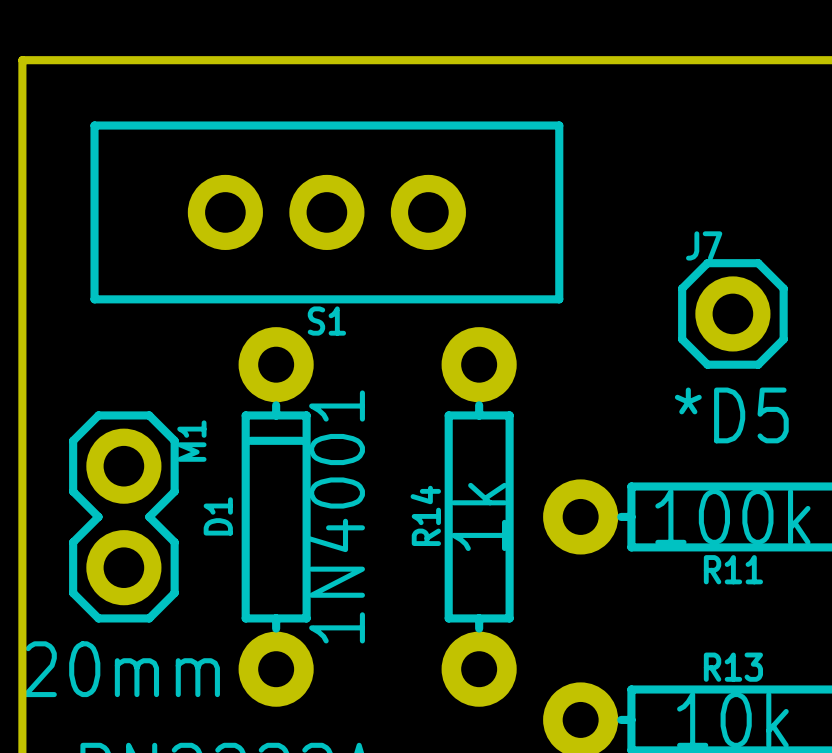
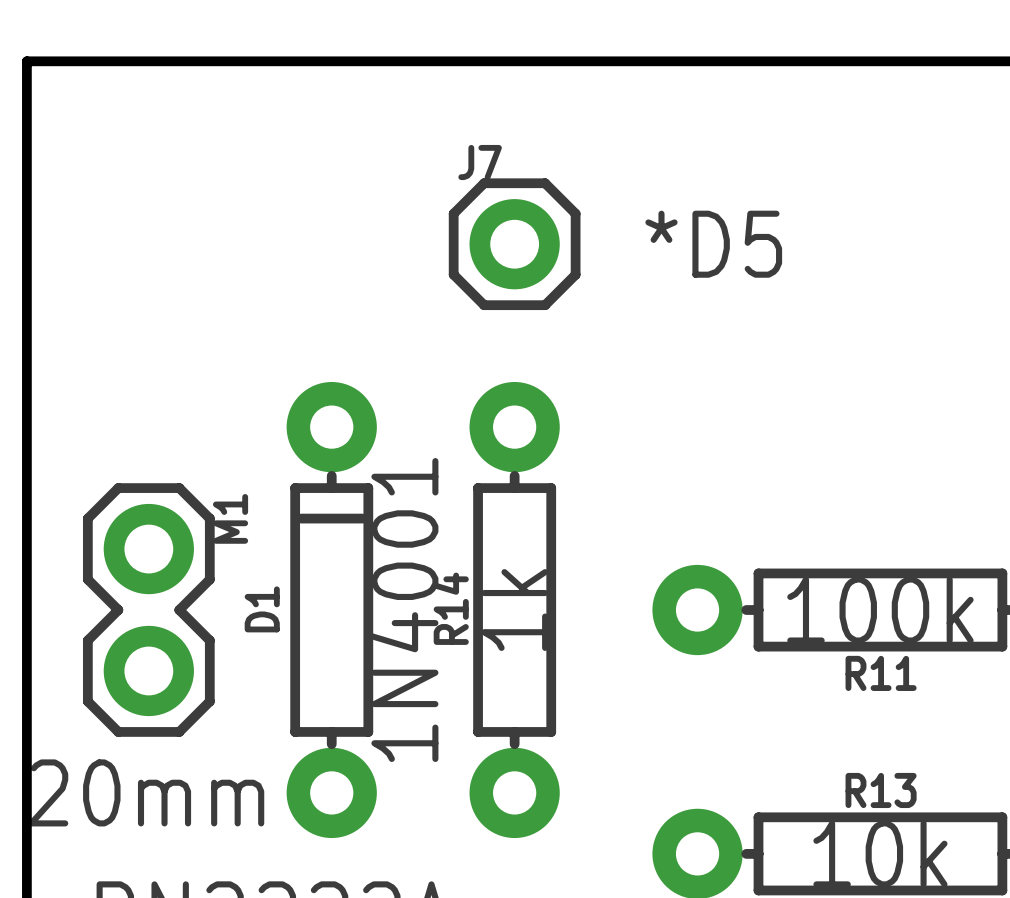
S1: (326, 212) -> none
J7 position: (732, 313) -> (514, 244)
text position: *D5 (731, 415) -> *D5 (713, 244)
text position: 1k (479, 516) -> 1k (514, 610)
R14 position: (479, 516) -> (514, 610)

